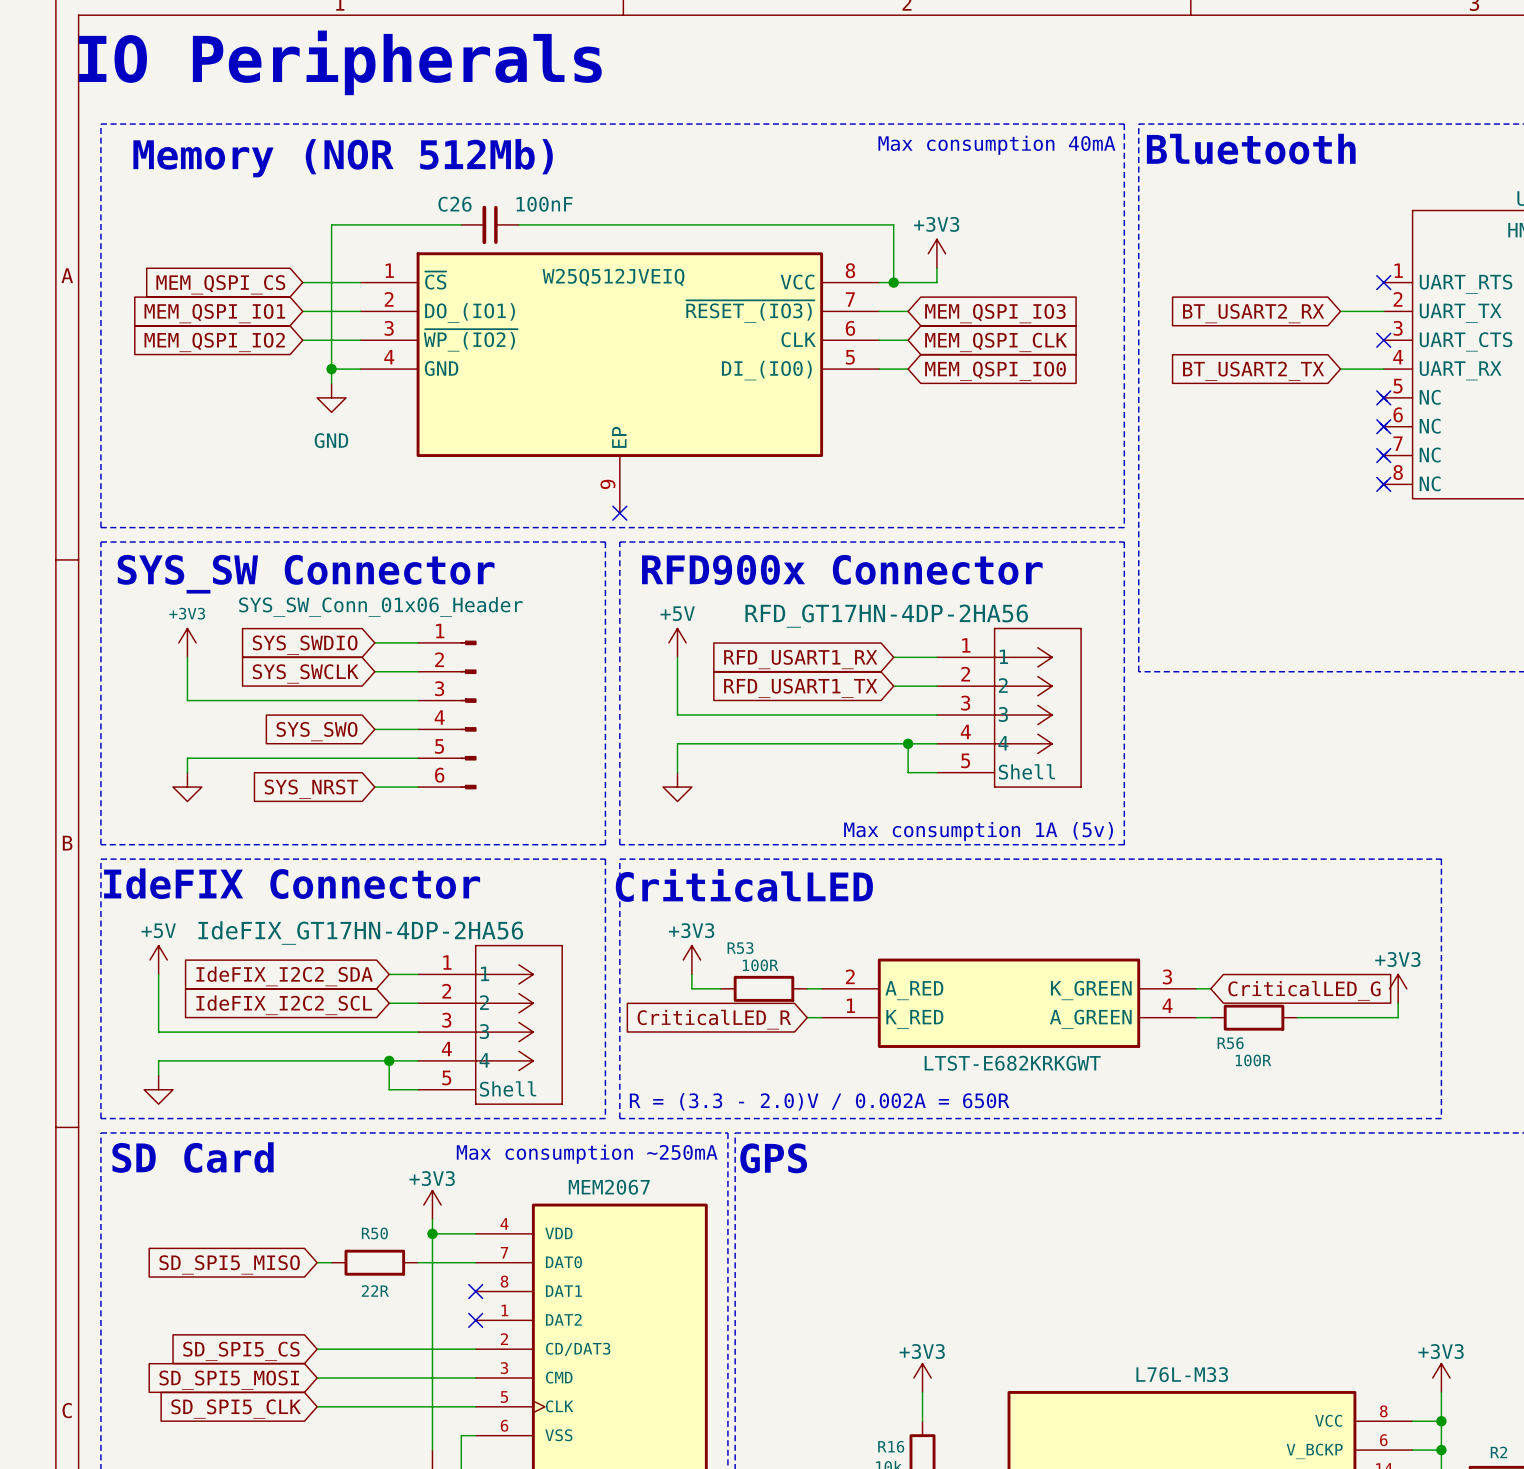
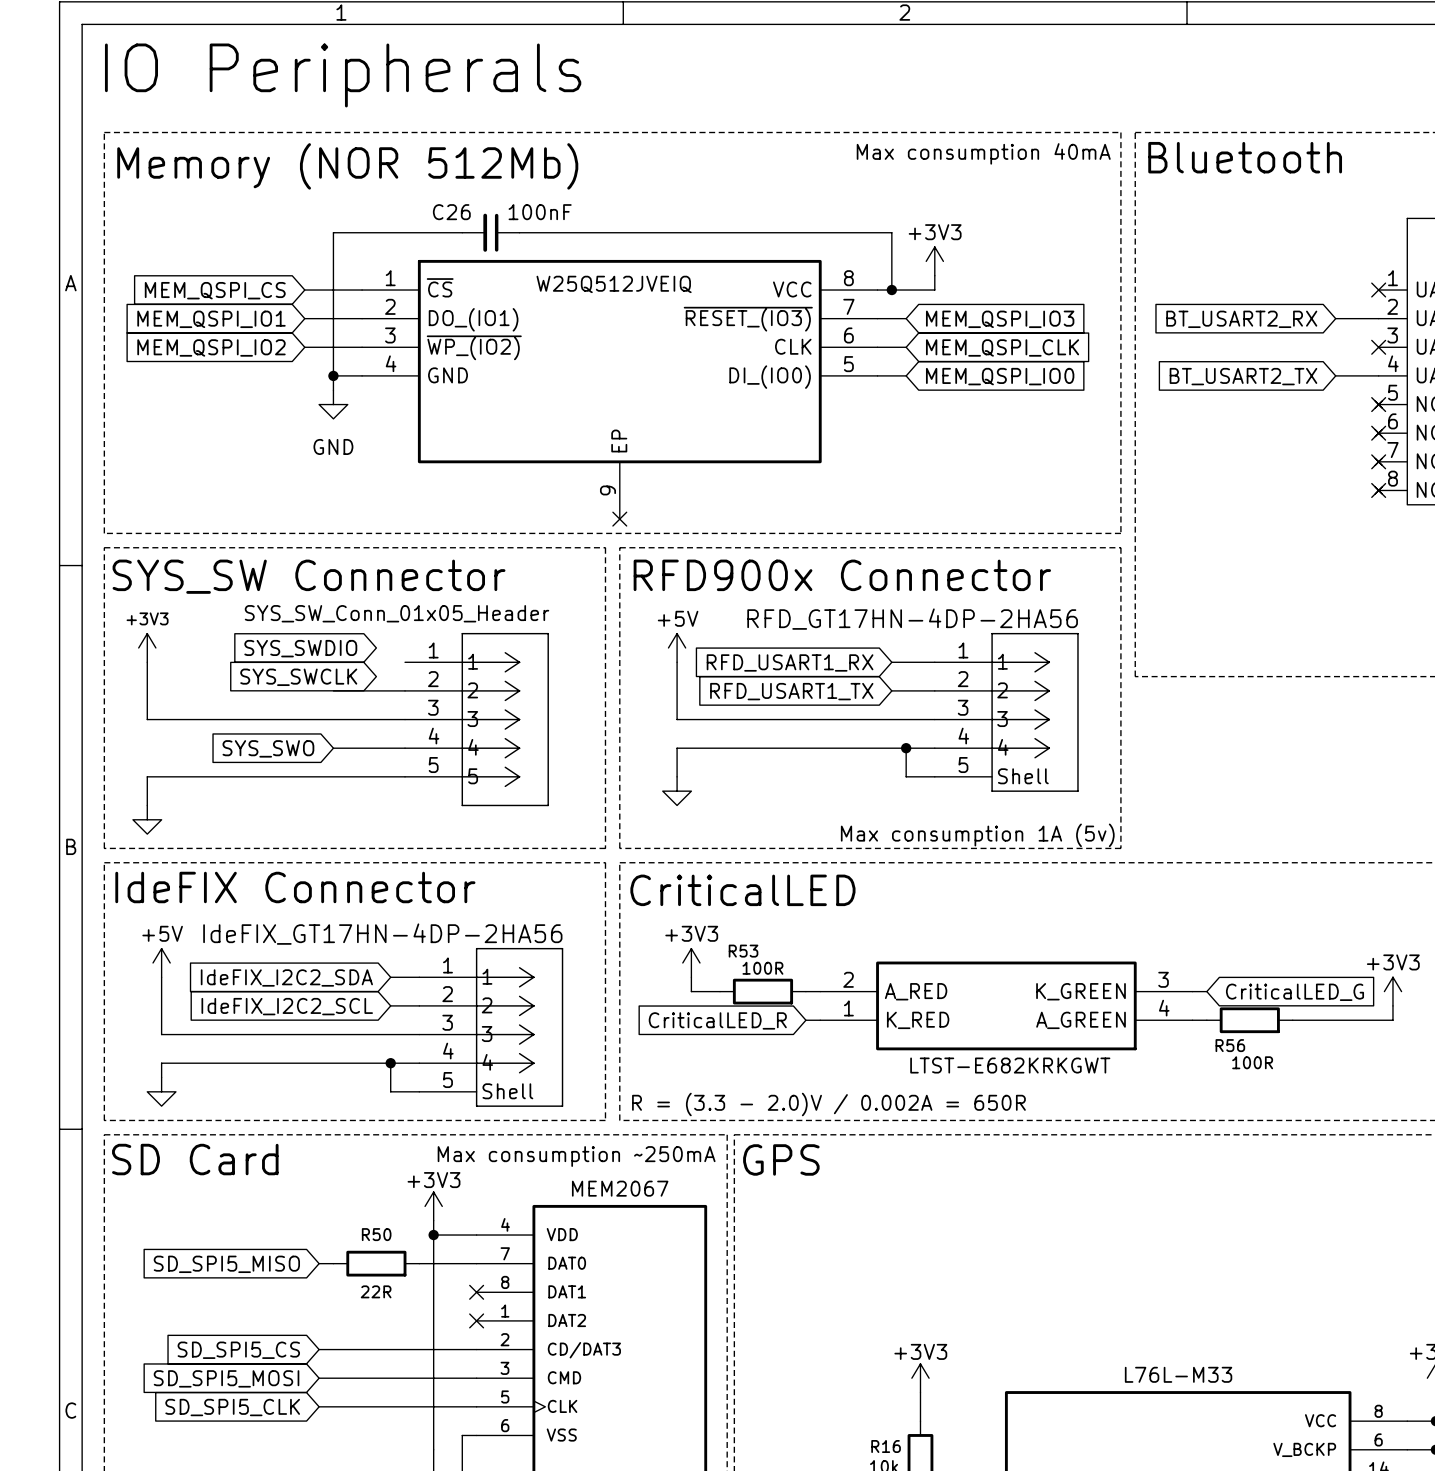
power symbol position: +3V3 (187, 642) -> +3V3 (147, 647)
wire: (374, 642) (418, 642) -> none
wire: none -> (147, 662) (147, 719) (405, 719)
wire: (187, 657) (187, 700) (418, 700) -> none
wire: (374, 671) (418, 671) -> none
wire: none -> (333, 690) (405, 690)
part: SYS_SW_Conn_01x06_Header (447, 714) -> none
part: none -> SYS_SW_Conn_01x05_Header (476, 719)
wire: (374, 729) (418, 729) -> none
global label position: SYS_SWO (317, 731) -> SYS_SWO (268, 748)
wire: none -> (333, 748) (405, 748)
wire: (418, 758) (187, 758) (187, 772) -> none
wire: none -> (405, 776) (147, 776) (147, 805)
power symbol position: (187, 787) -> (147, 819)
wire: (374, 787) (418, 787) -> none
global label: SYS_NRST (311, 789) -> none

